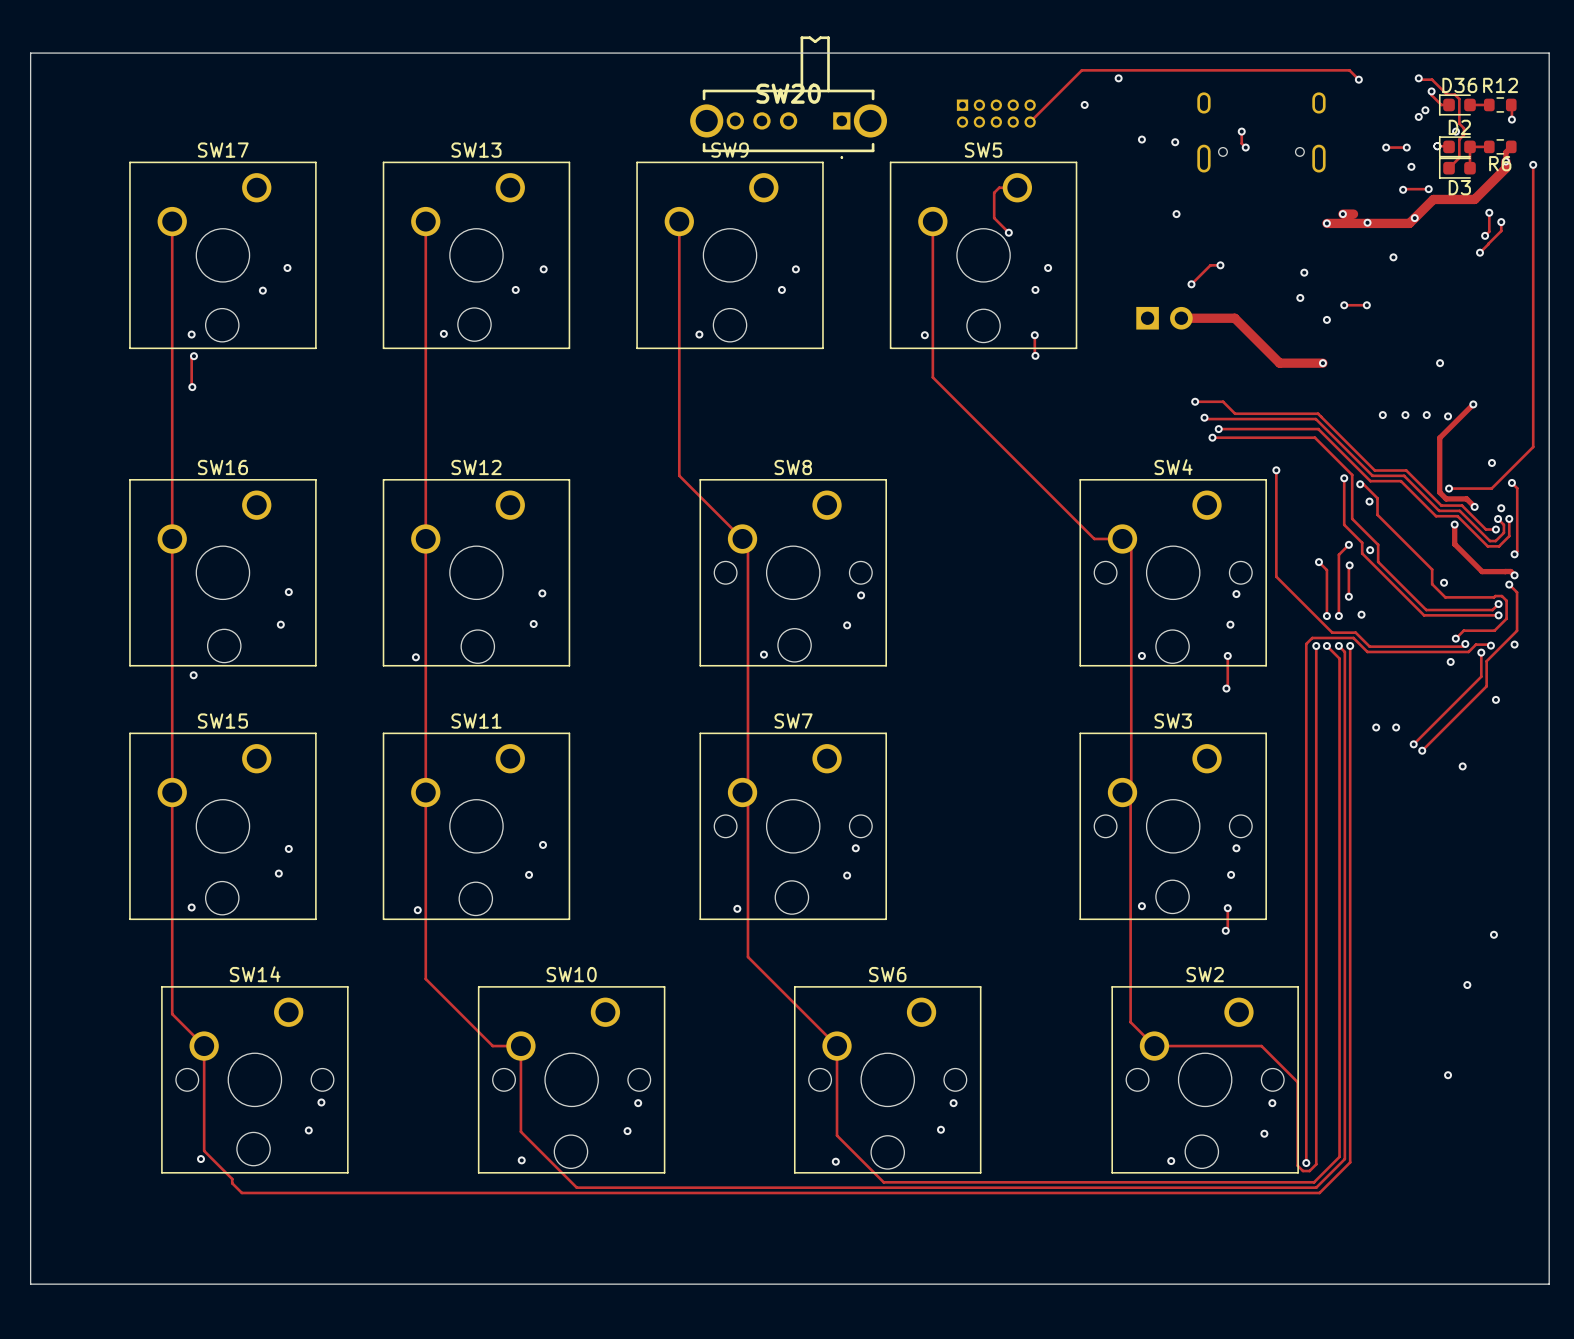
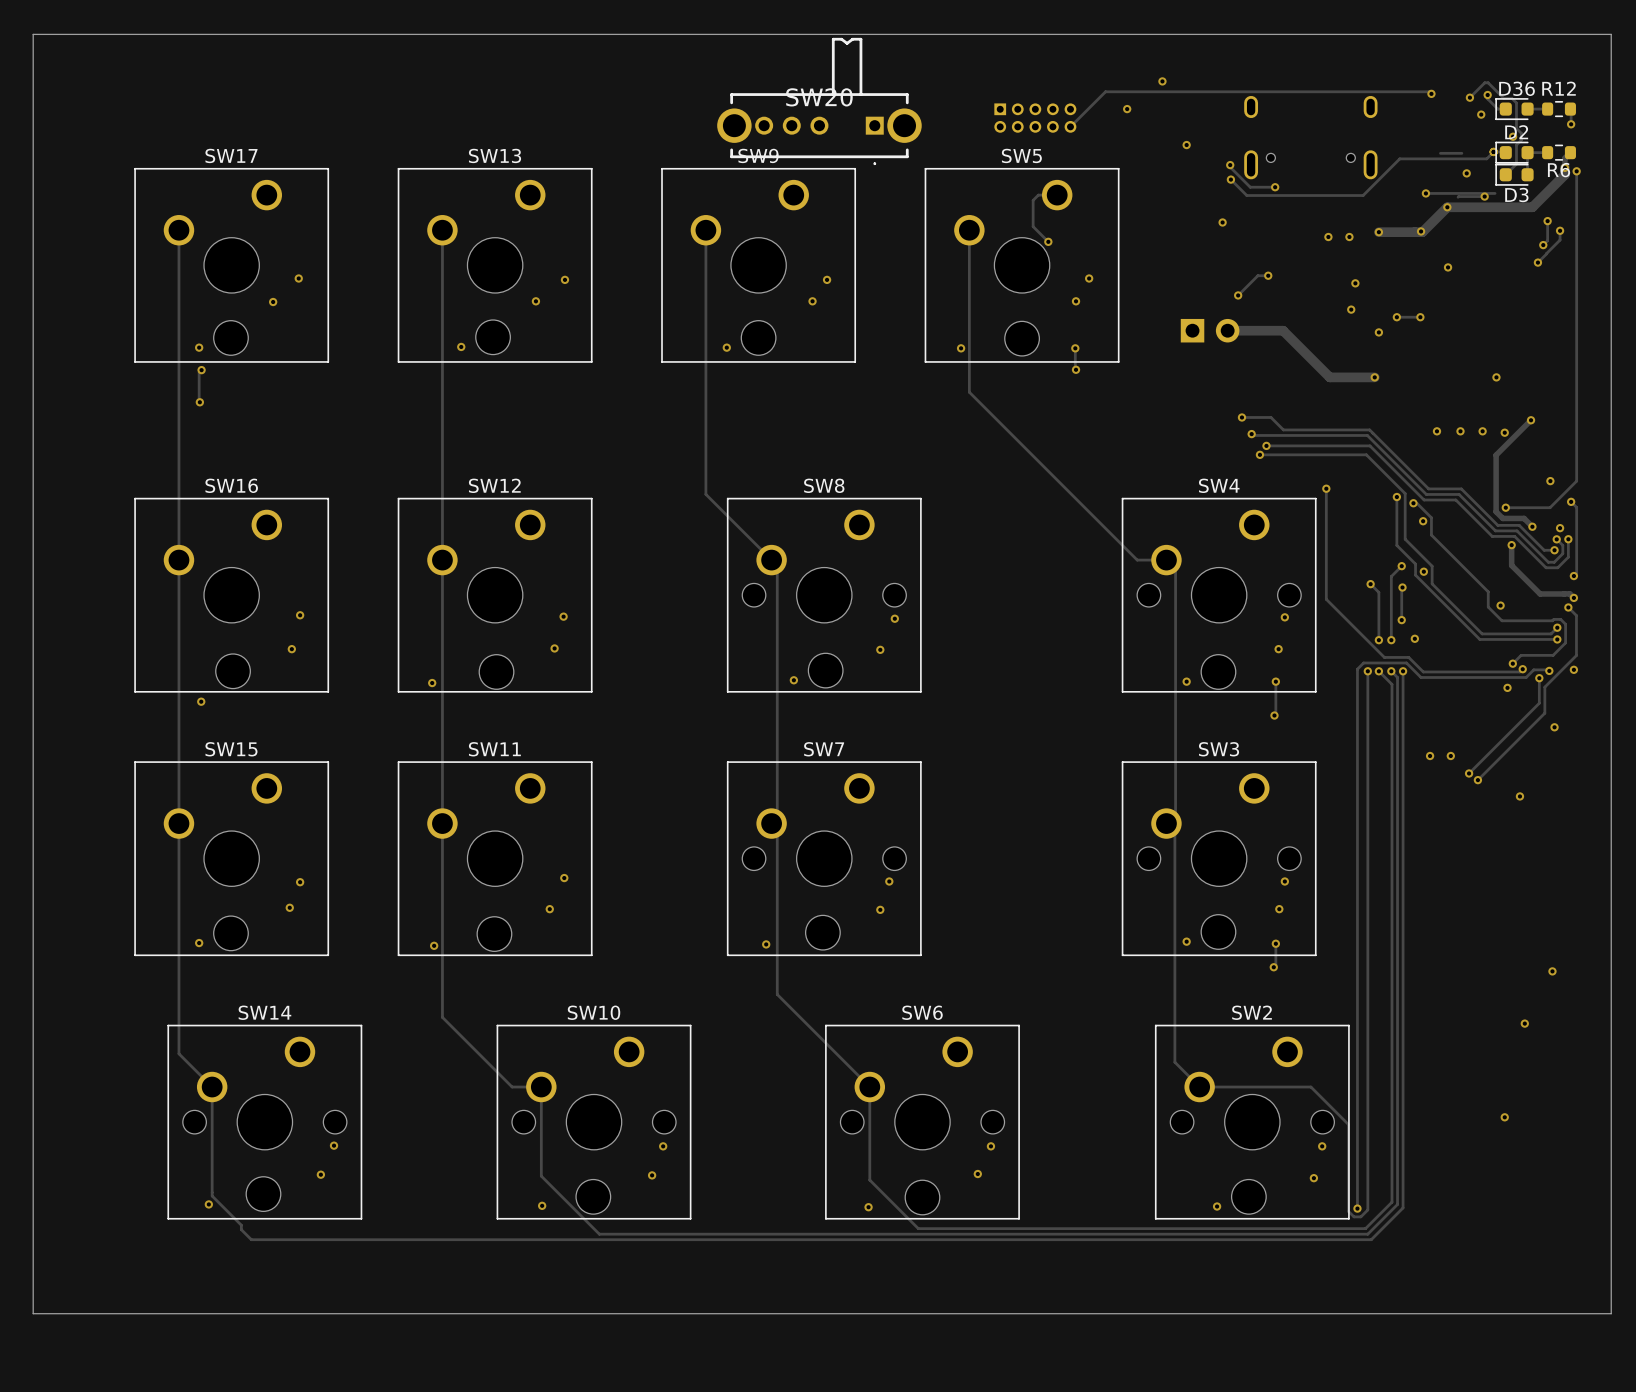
board edge: (30, 53) (1549, 53) (1549, 1284) (30, 1284) (30, 53) -> (33, 34) (1611, 34) (1611, 1313) (33, 1313) (33, 34)
track: (1418, 78) (1428, 79) -> (1469, 97) (1484, 82)
via: (1418, 78) -> none
track: (1358, 79) (1349, 70) (1081, 70) (1063, 88) -> (1431, 93) (1429, 91) (1105, 91)
via: (1358, 79) -> none
via: none -> (1431, 93)
via: none -> (1469, 97)
via: (1418, 116) -> none
track: (1241, 131) (1241, 143) (1245, 147) -> none
via: (1241, 131) -> none
via: (1175, 142) -> none
track: none -> (1493, 151) (1486, 158) (1399, 158) (1363, 195) (1246, 195) (1230, 179)
via: (1245, 147) -> none
via: (1386, 147) -> none
via: (1406, 147) -> none
track: none -> (1230, 165) (1250, 187) (1275, 187)
via: none -> (1230, 165)
track: (1533, 164) (1533, 447) (1517, 462) -> (1576, 171) (1576, 481)
via position: (1533, 164) -> (1576, 171)
via: none -> (1230, 179)
via: none -> (1275, 187)
track: none -> (1425, 193) (1495, 193)
via: none -> (1425, 193)
via position: (1403, 189) -> (1447, 207)
track: (1433, 199) (1409, 223) (1368, 223) -> (1489, 207) (1447, 207) (1422, 232)
track: (1342, 214) (1353, 214) -> none
via: (1342, 214) -> none
via: (1414, 218) -> none
via: none -> (1328, 237)
via: none -> (1349, 237)

